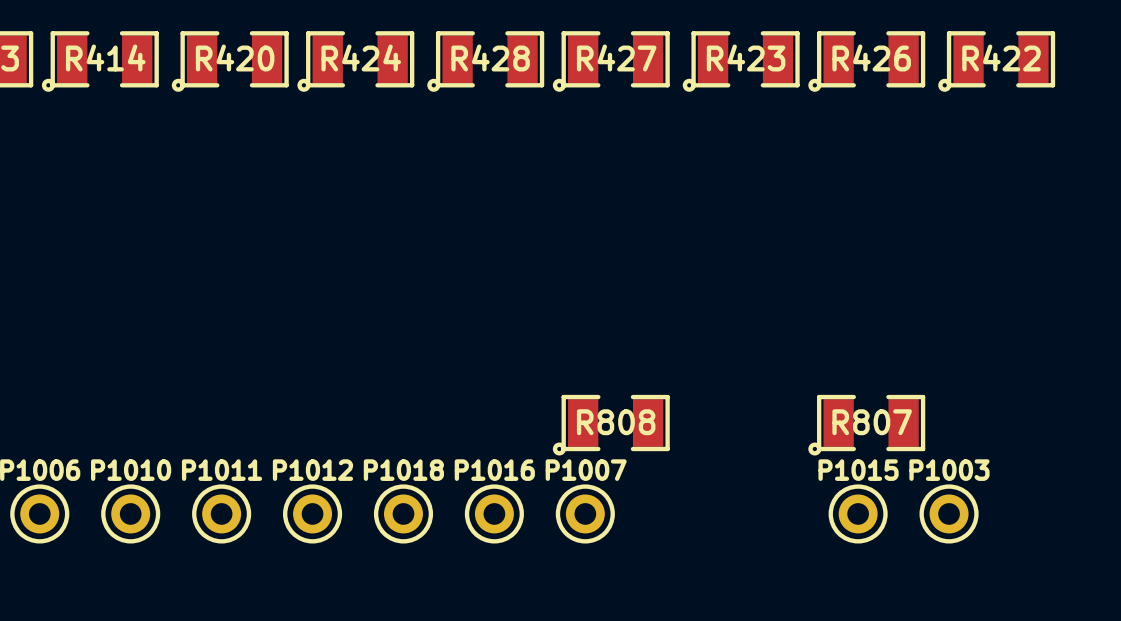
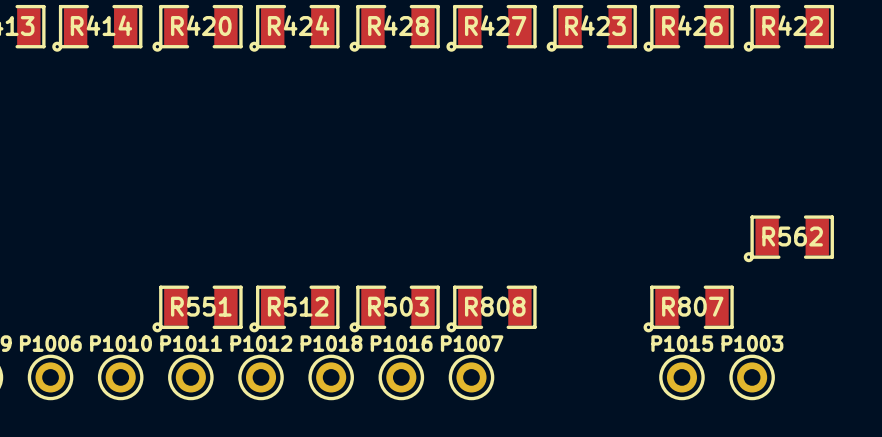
R562: none -> (788, 238)
R551: none -> (197, 308)
R512: none -> (294, 308)
R503: none -> (394, 308)

